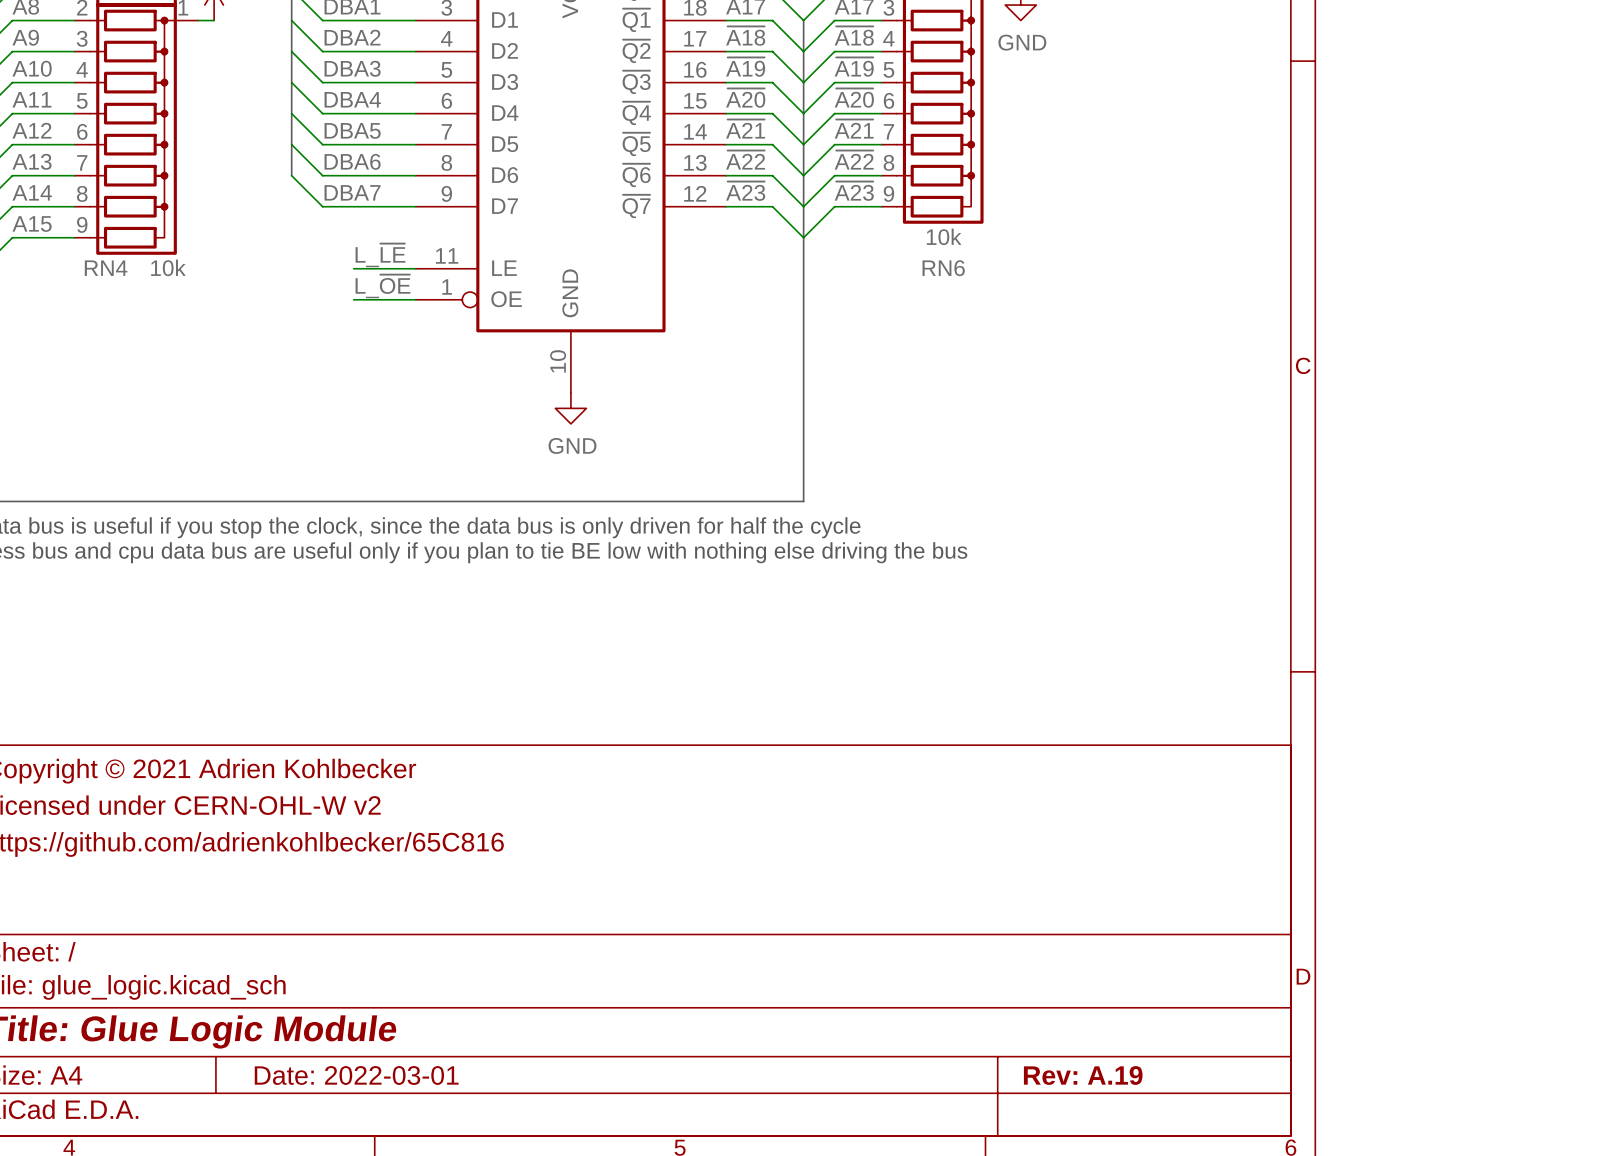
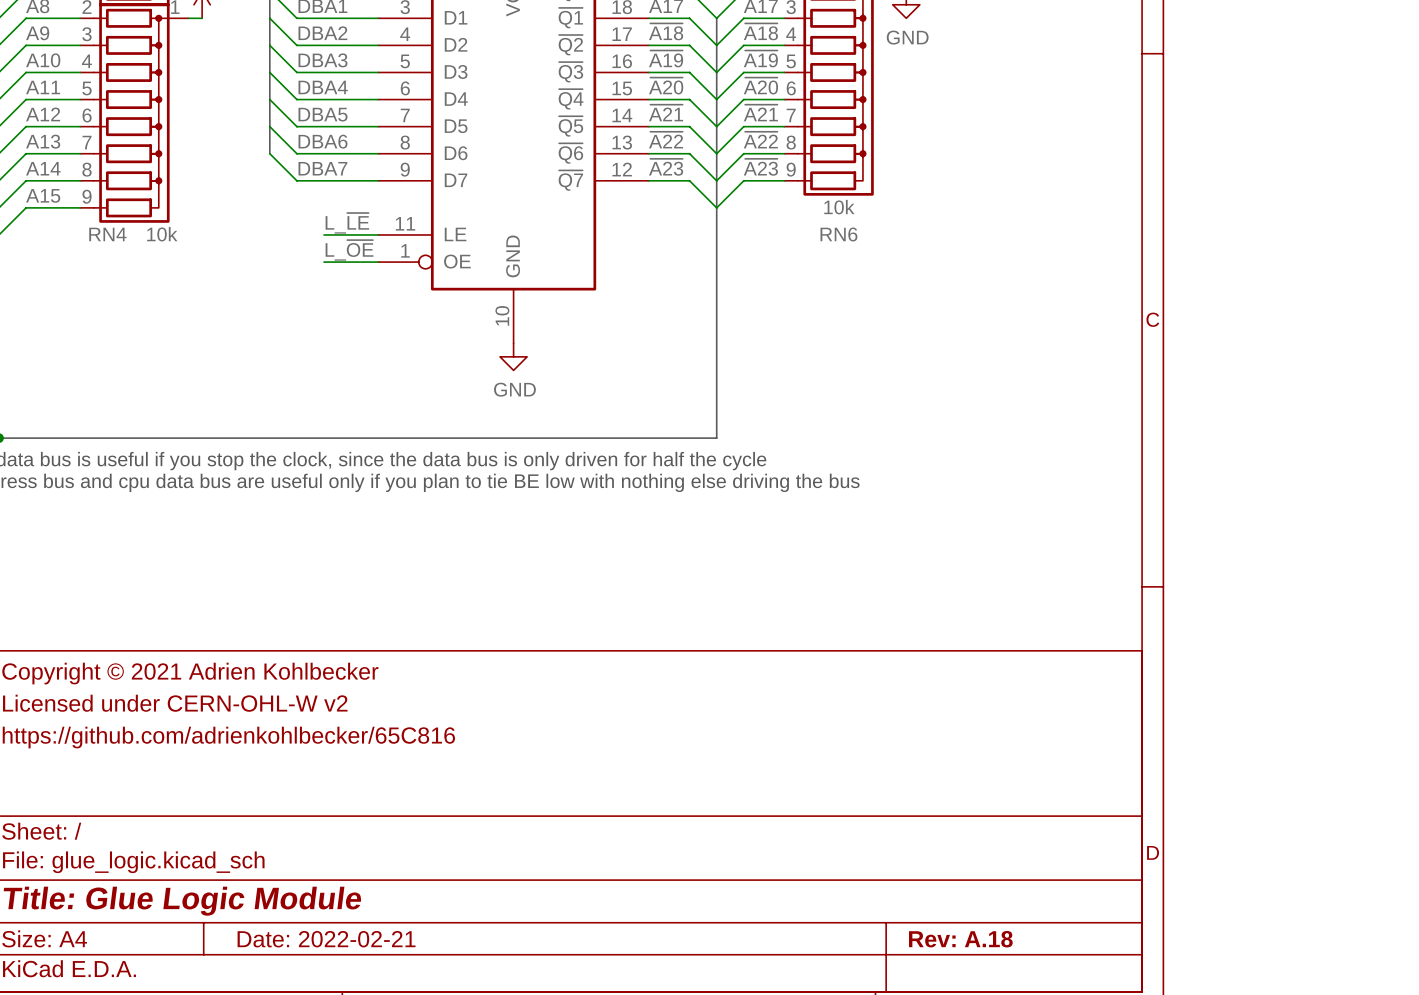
title block: Date: 2022-03-01 (356, 1075) -> Date: 2022-02-21 (326, 939)
title block: Rev: A.19 (1083, 1075) -> Rev: A.18 (960, 939)

